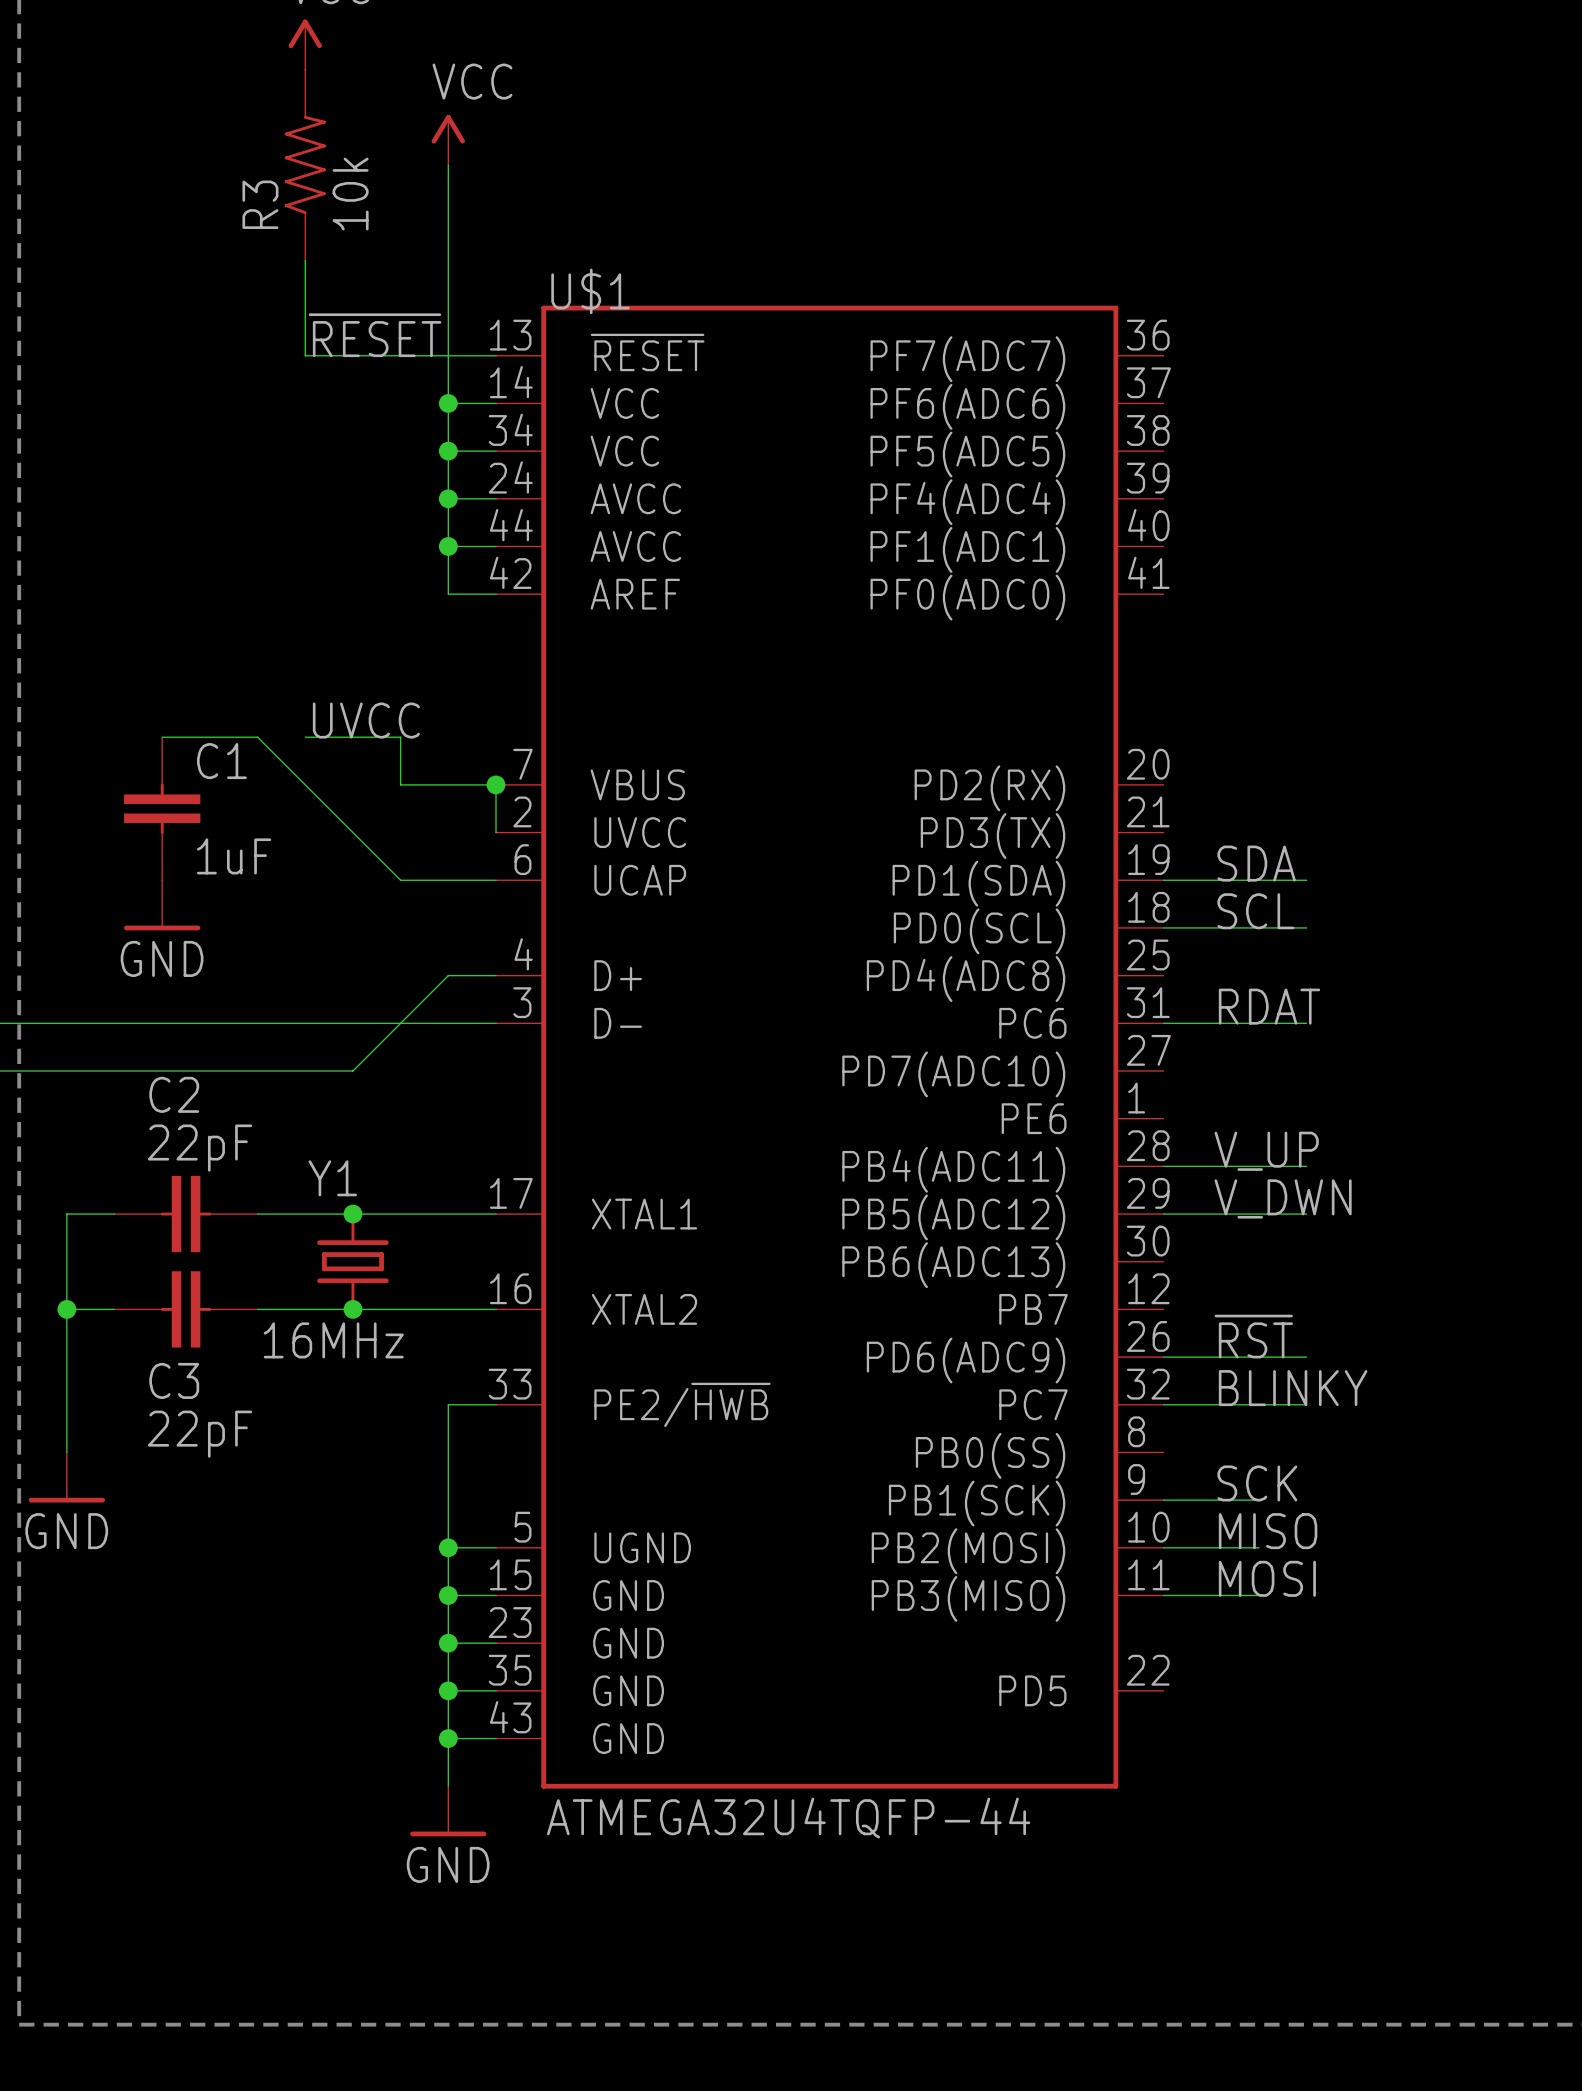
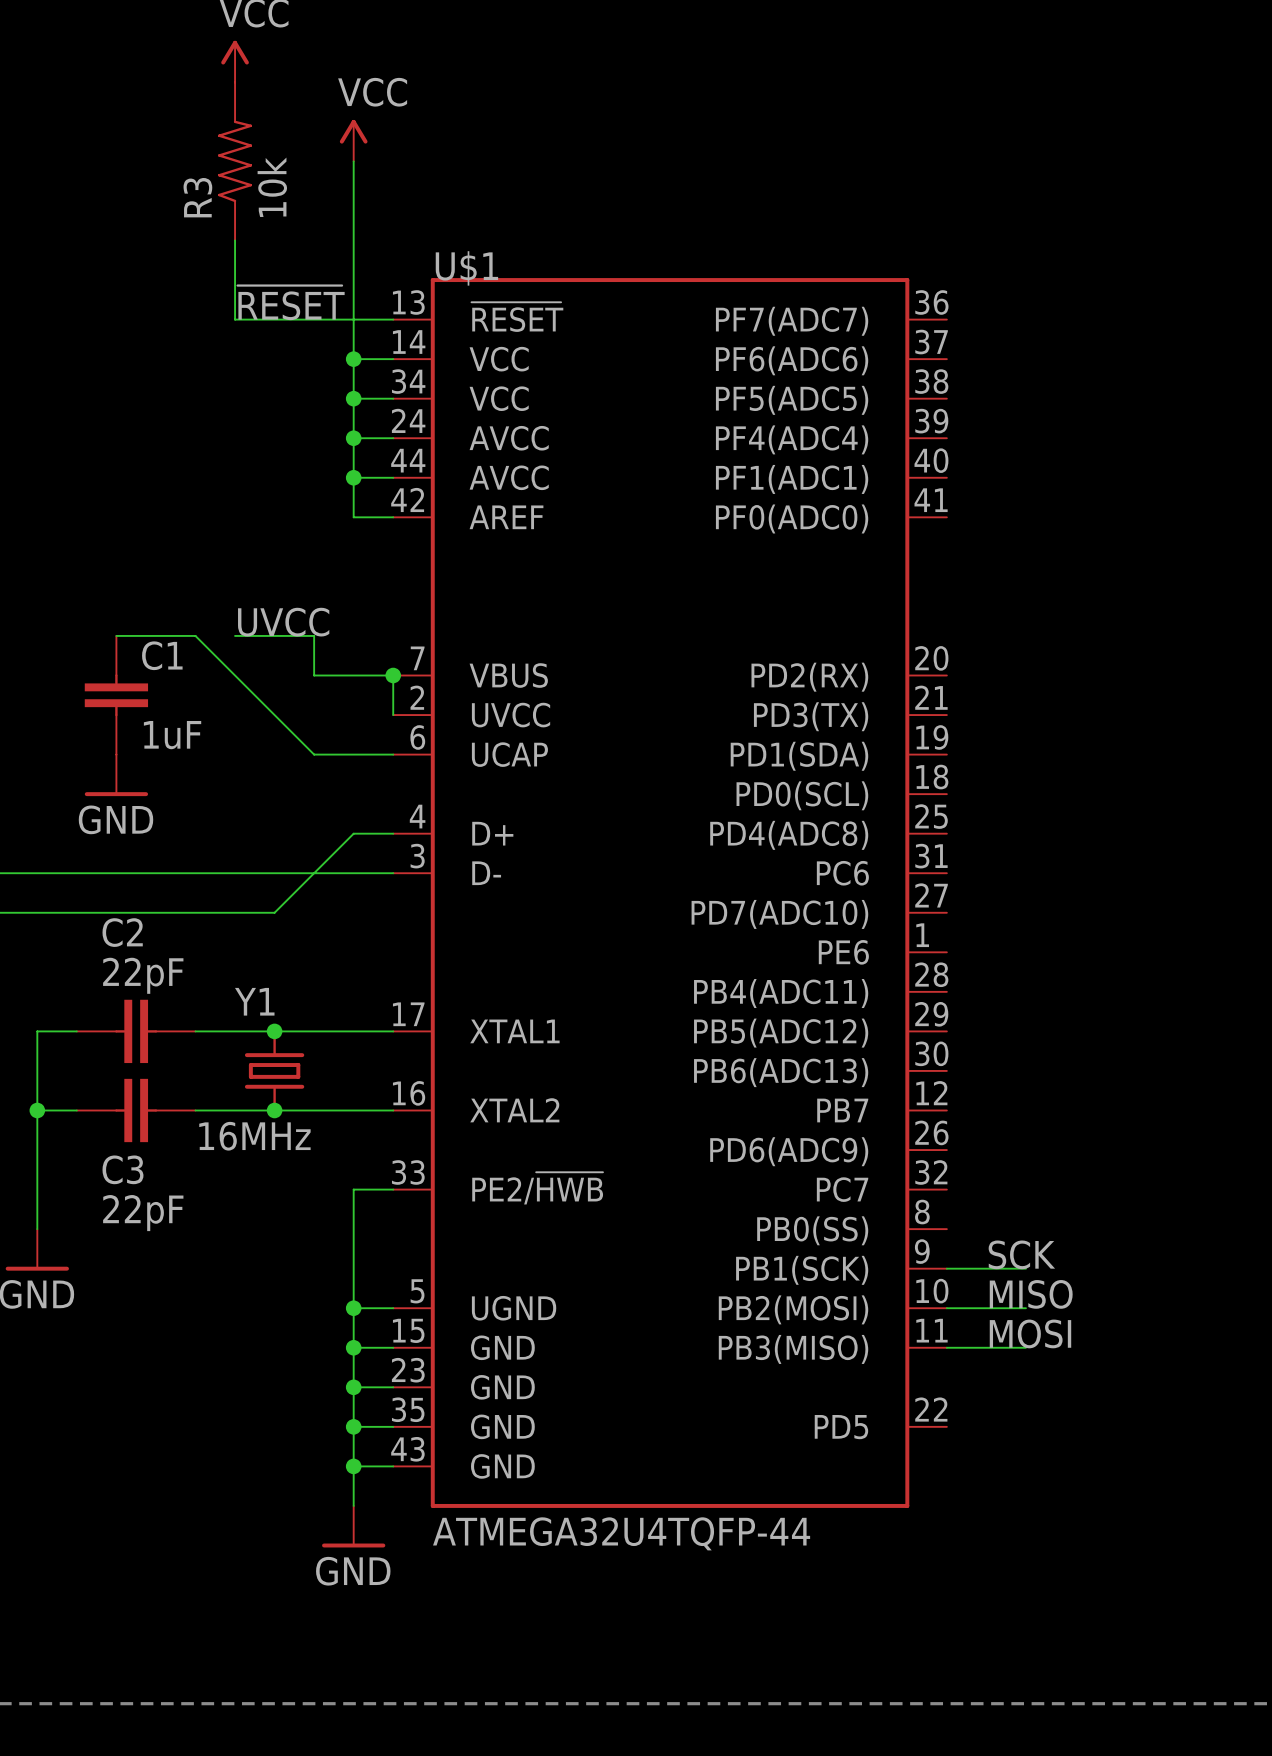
label: SDA (1256, 863) -> none
wire: (1163, 880) (1306, 880) -> none
label: SCL (1255, 911) -> none
wire: (1163, 927) (1306, 927) -> none
label: RDAT (1269, 1006) -> none
wire: (1163, 1023) (1306, 1023) -> none
label: V_UP (1266, 1151) -> none
wire: (1163, 1166) (1306, 1166) -> none
label: V_DWN (1283, 1198) -> none
wire: (1163, 1214) (1306, 1214) -> none
label: ~{RST} (1253, 1336) -> none
wire: (1163, 1357) (1306, 1357) -> none
label: BLINKY (1293, 1388) -> none
wire: (1163, 1404) (1306, 1404) -> none

